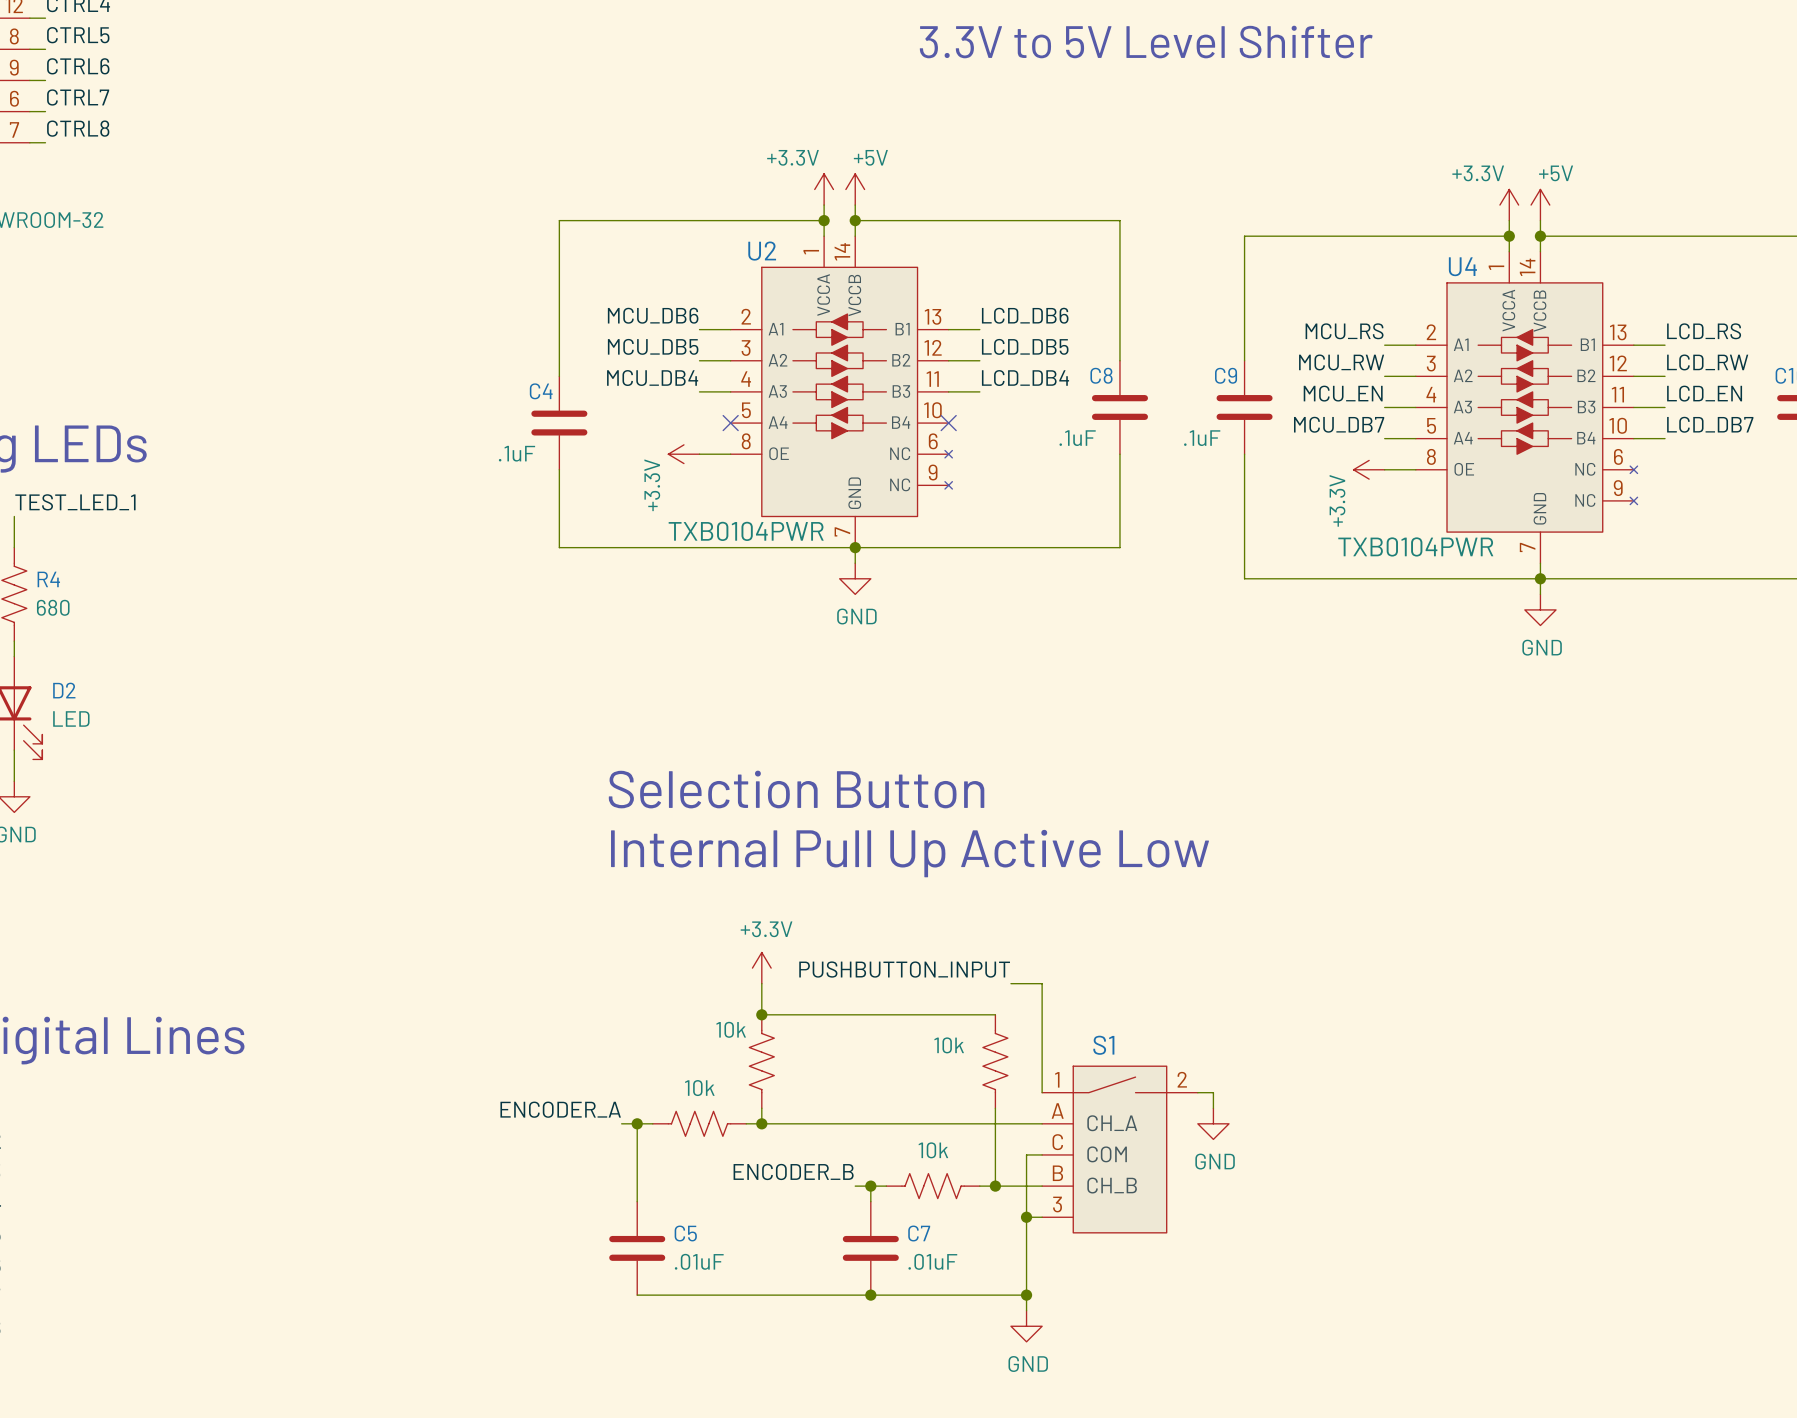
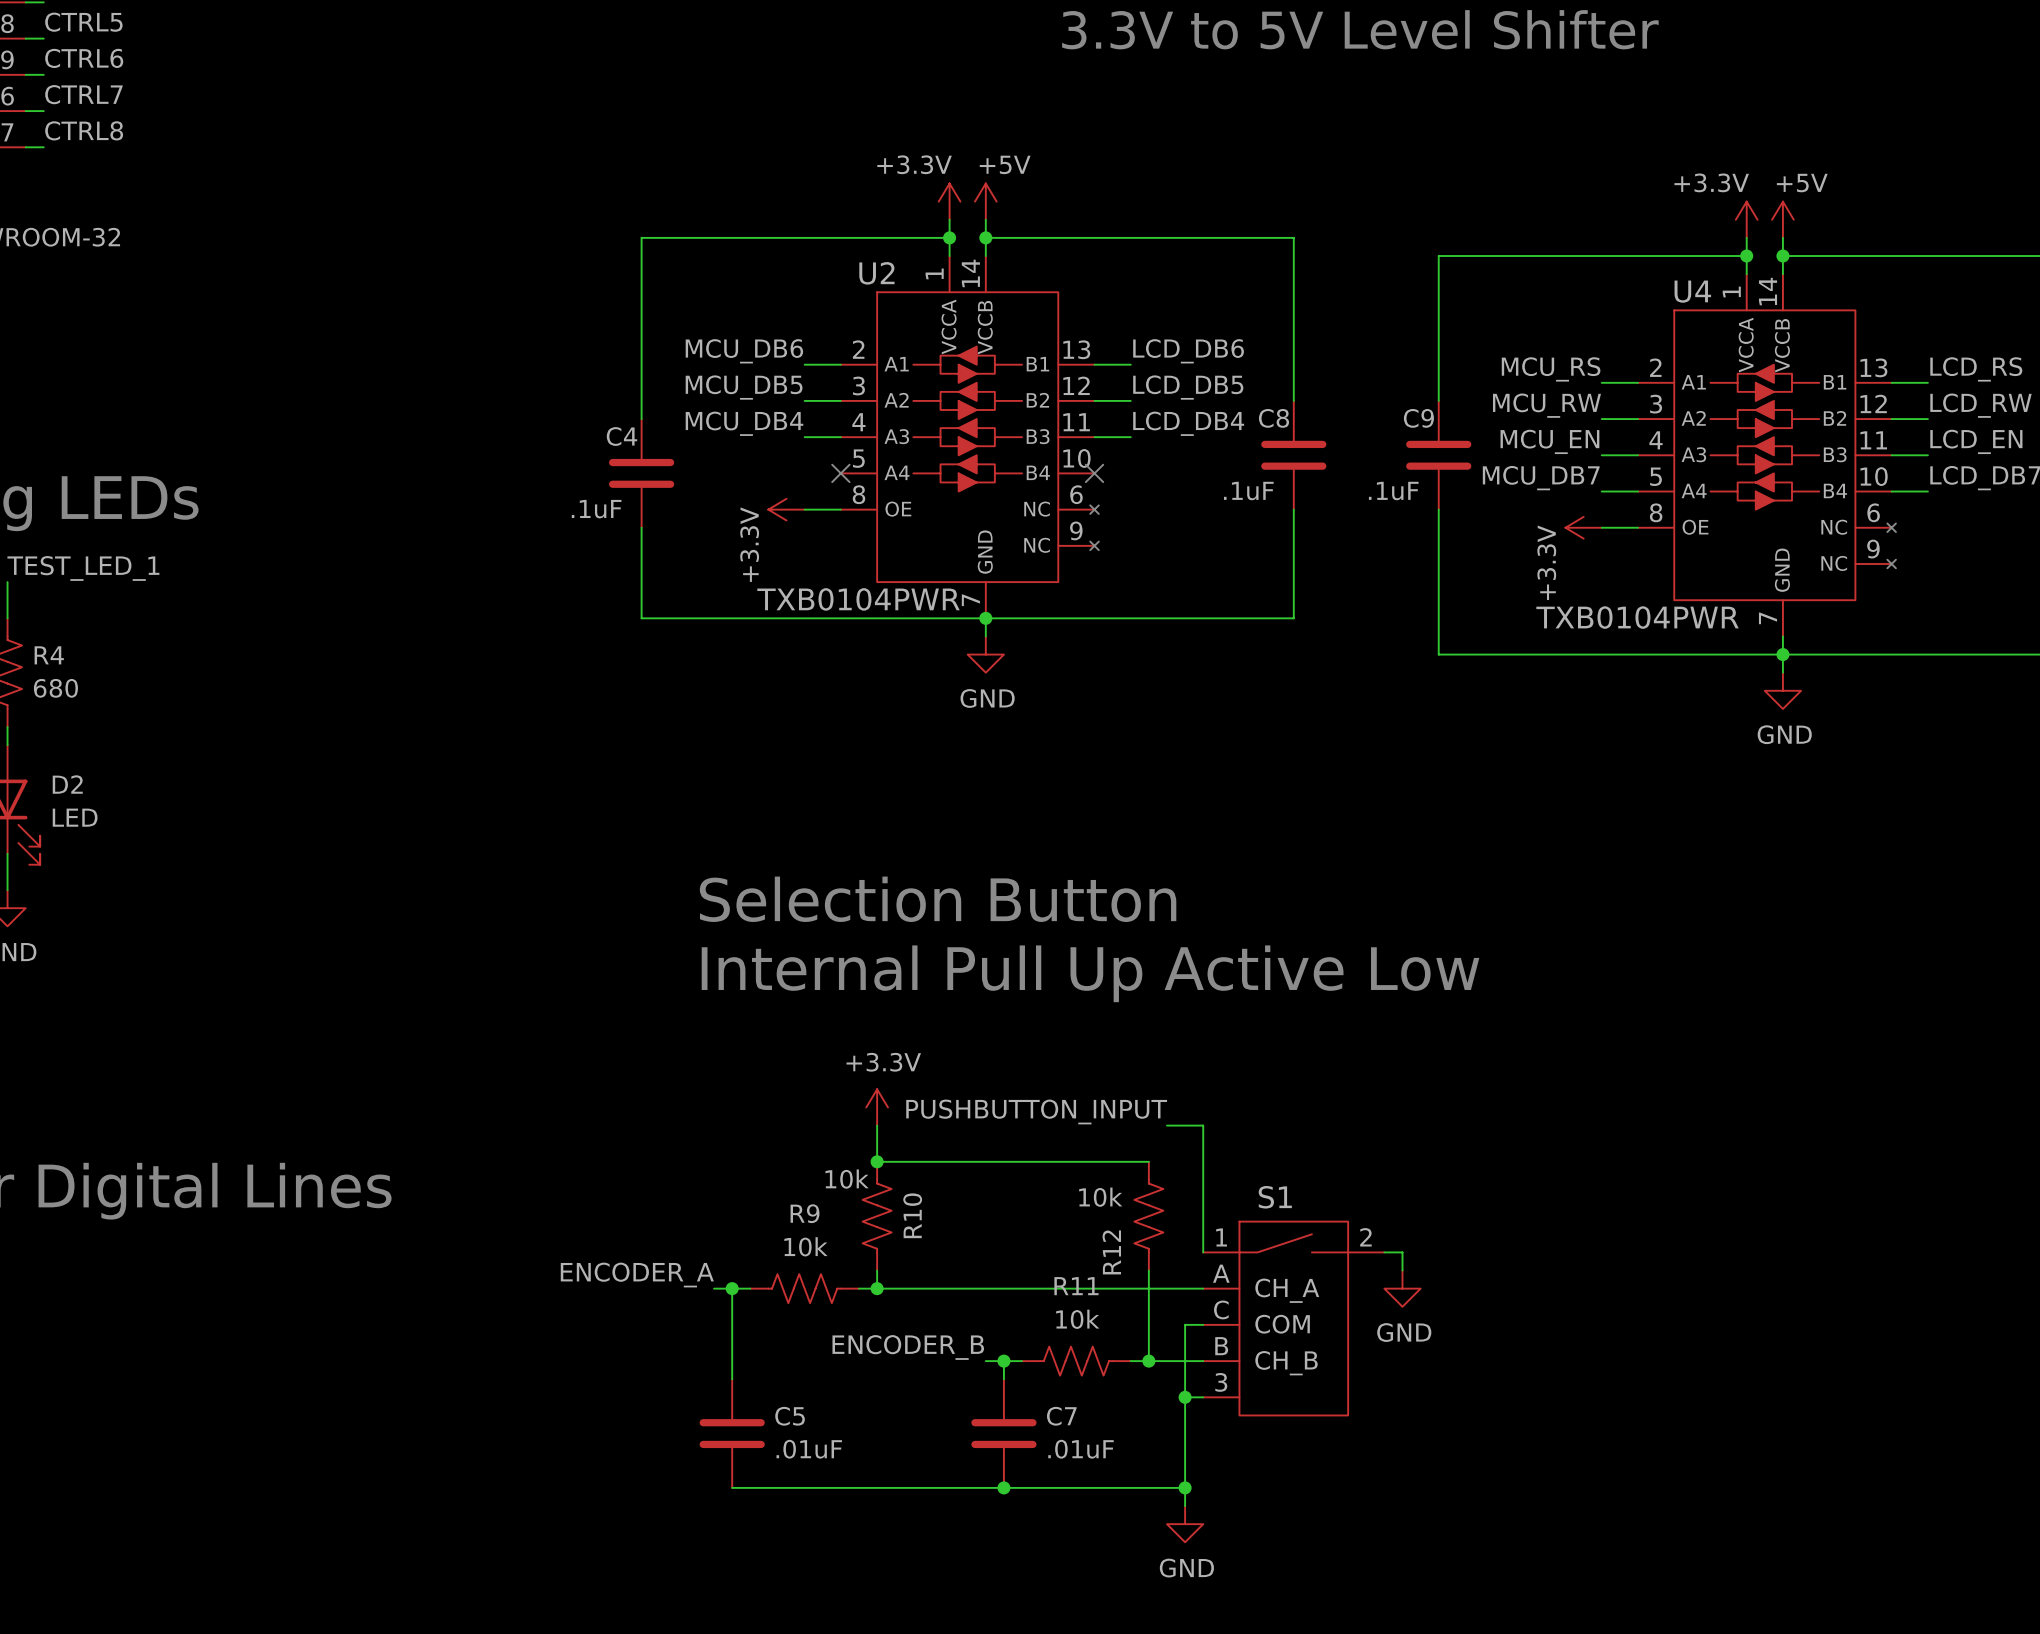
R9 name: none -> R9 (805, 1213)
R10 name: none -> R10 (912, 1215)
R12 name: none -> R12 (1111, 1252)
R11 name: none -> R11 (1076, 1286)

